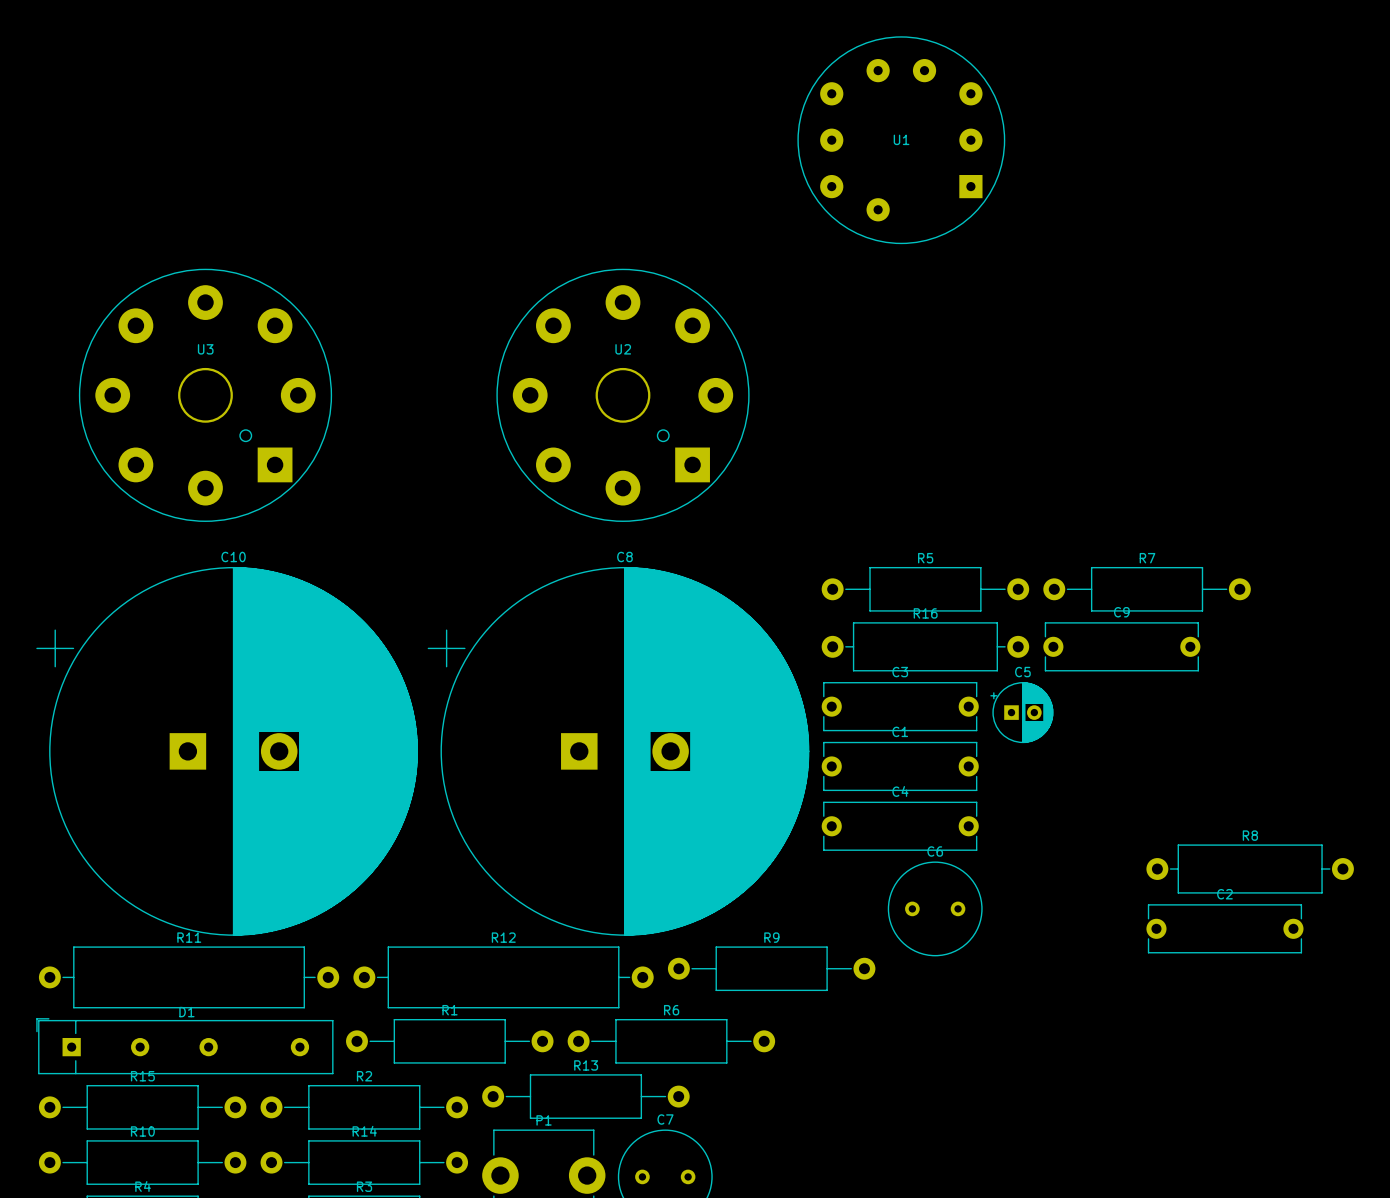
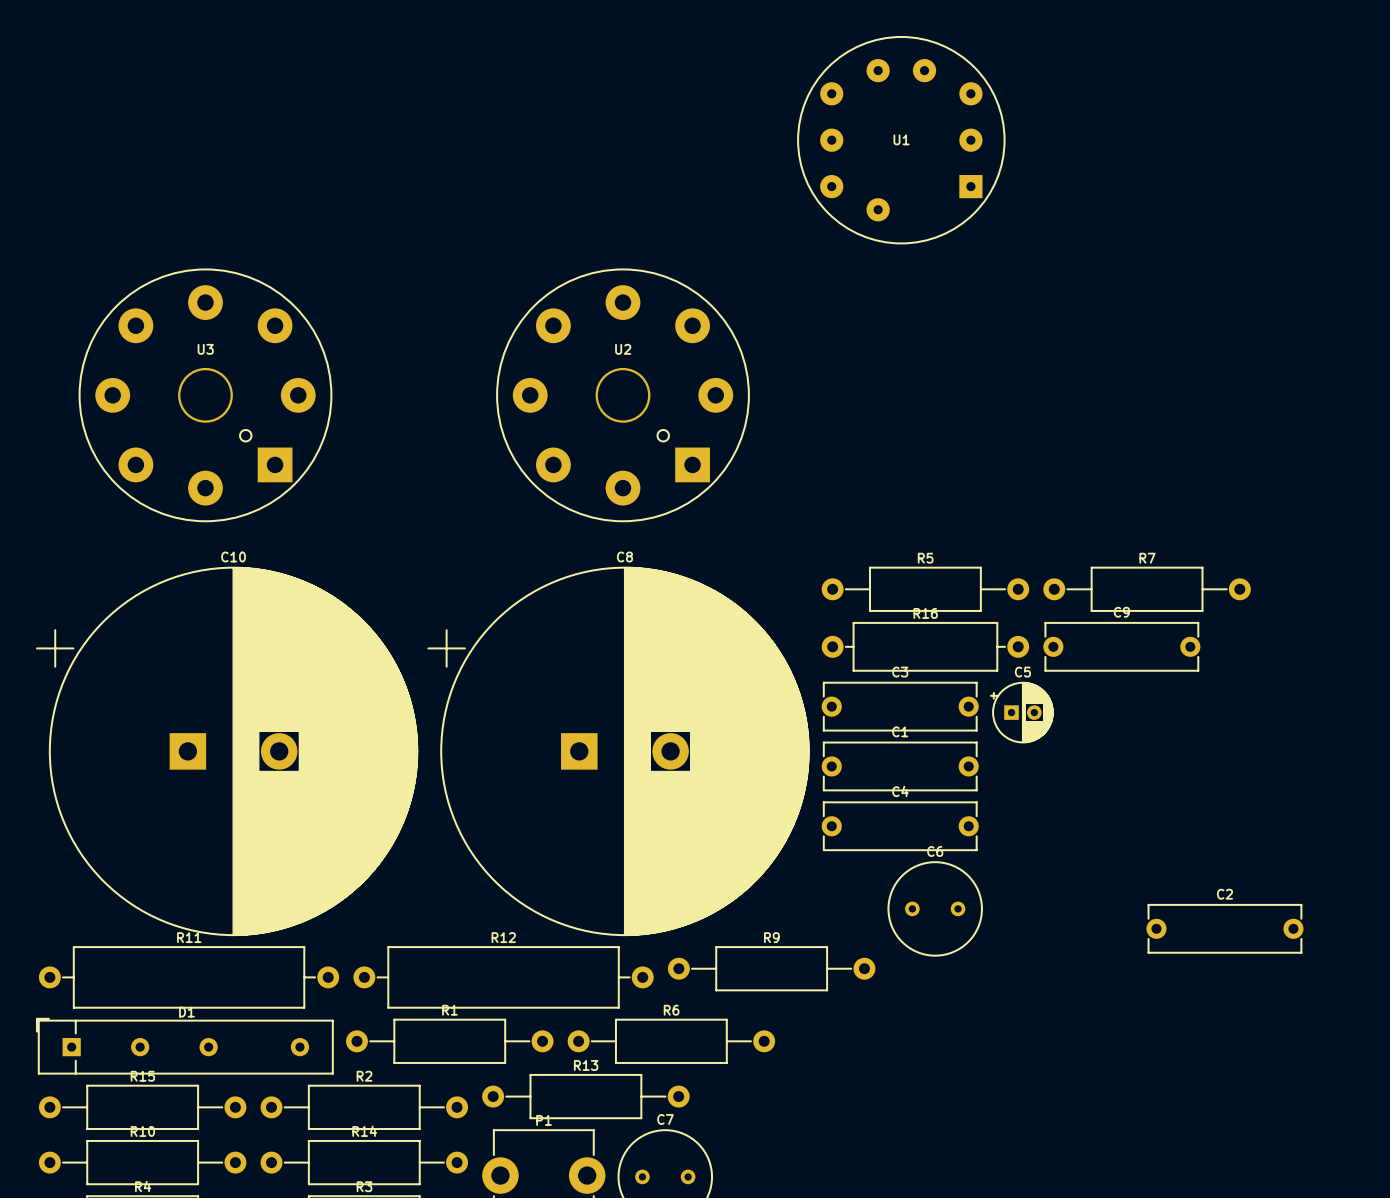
R8: (1250, 869) -> none

